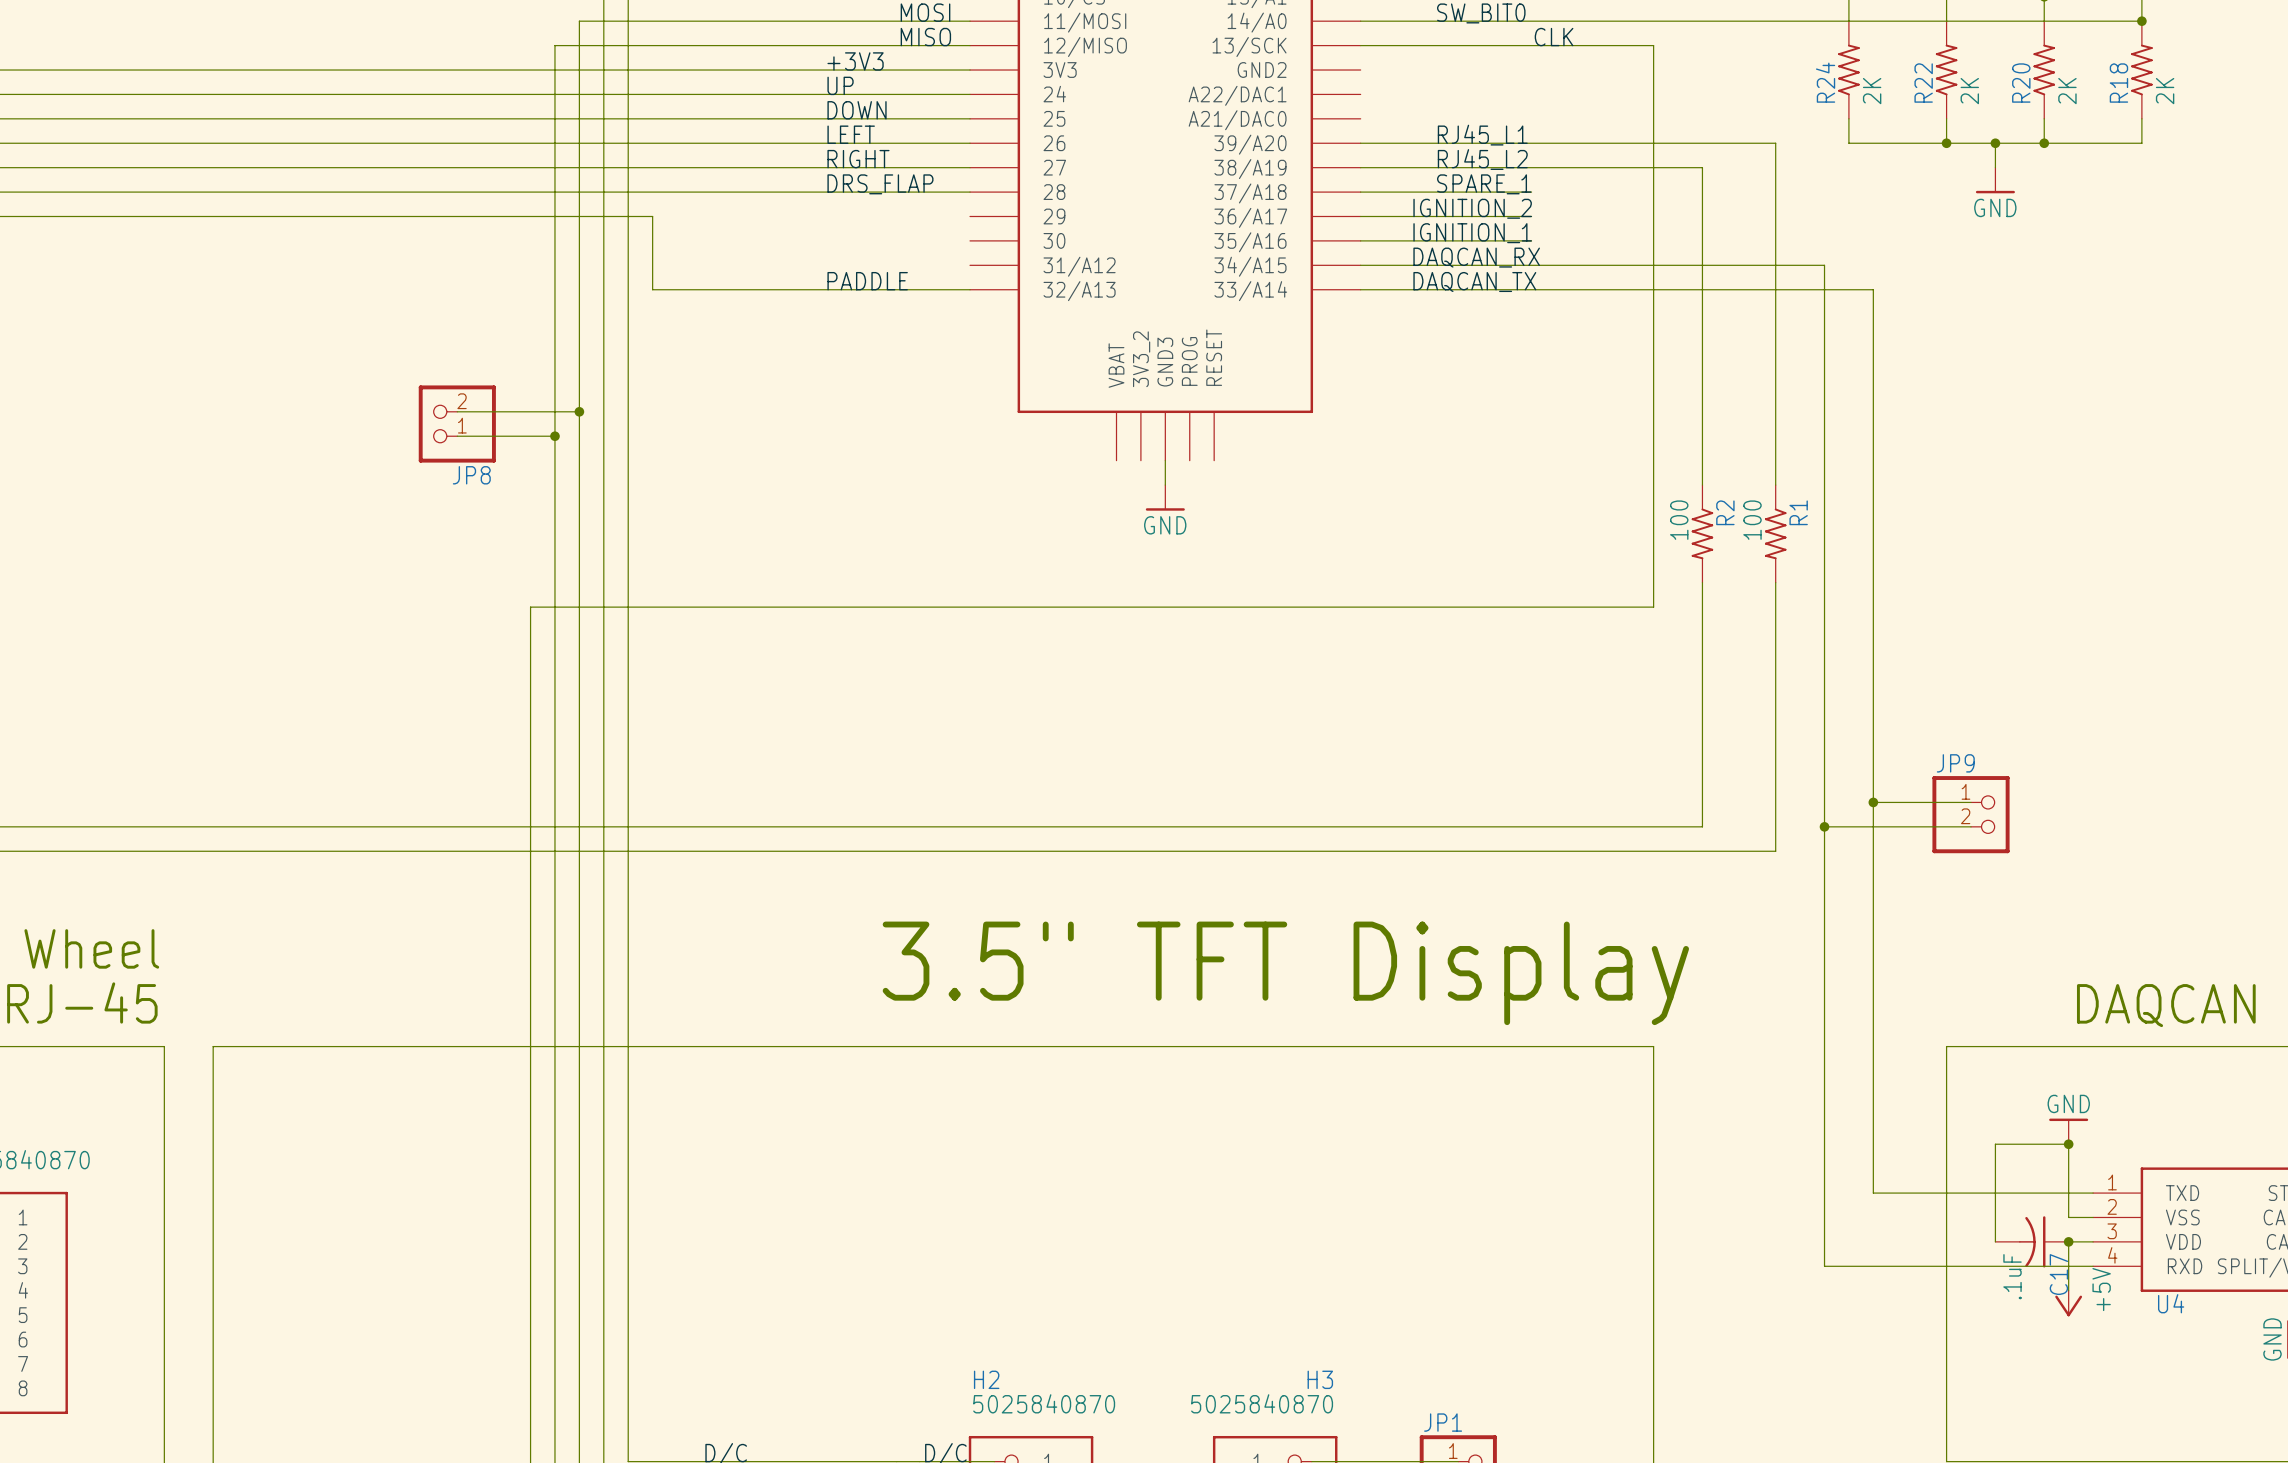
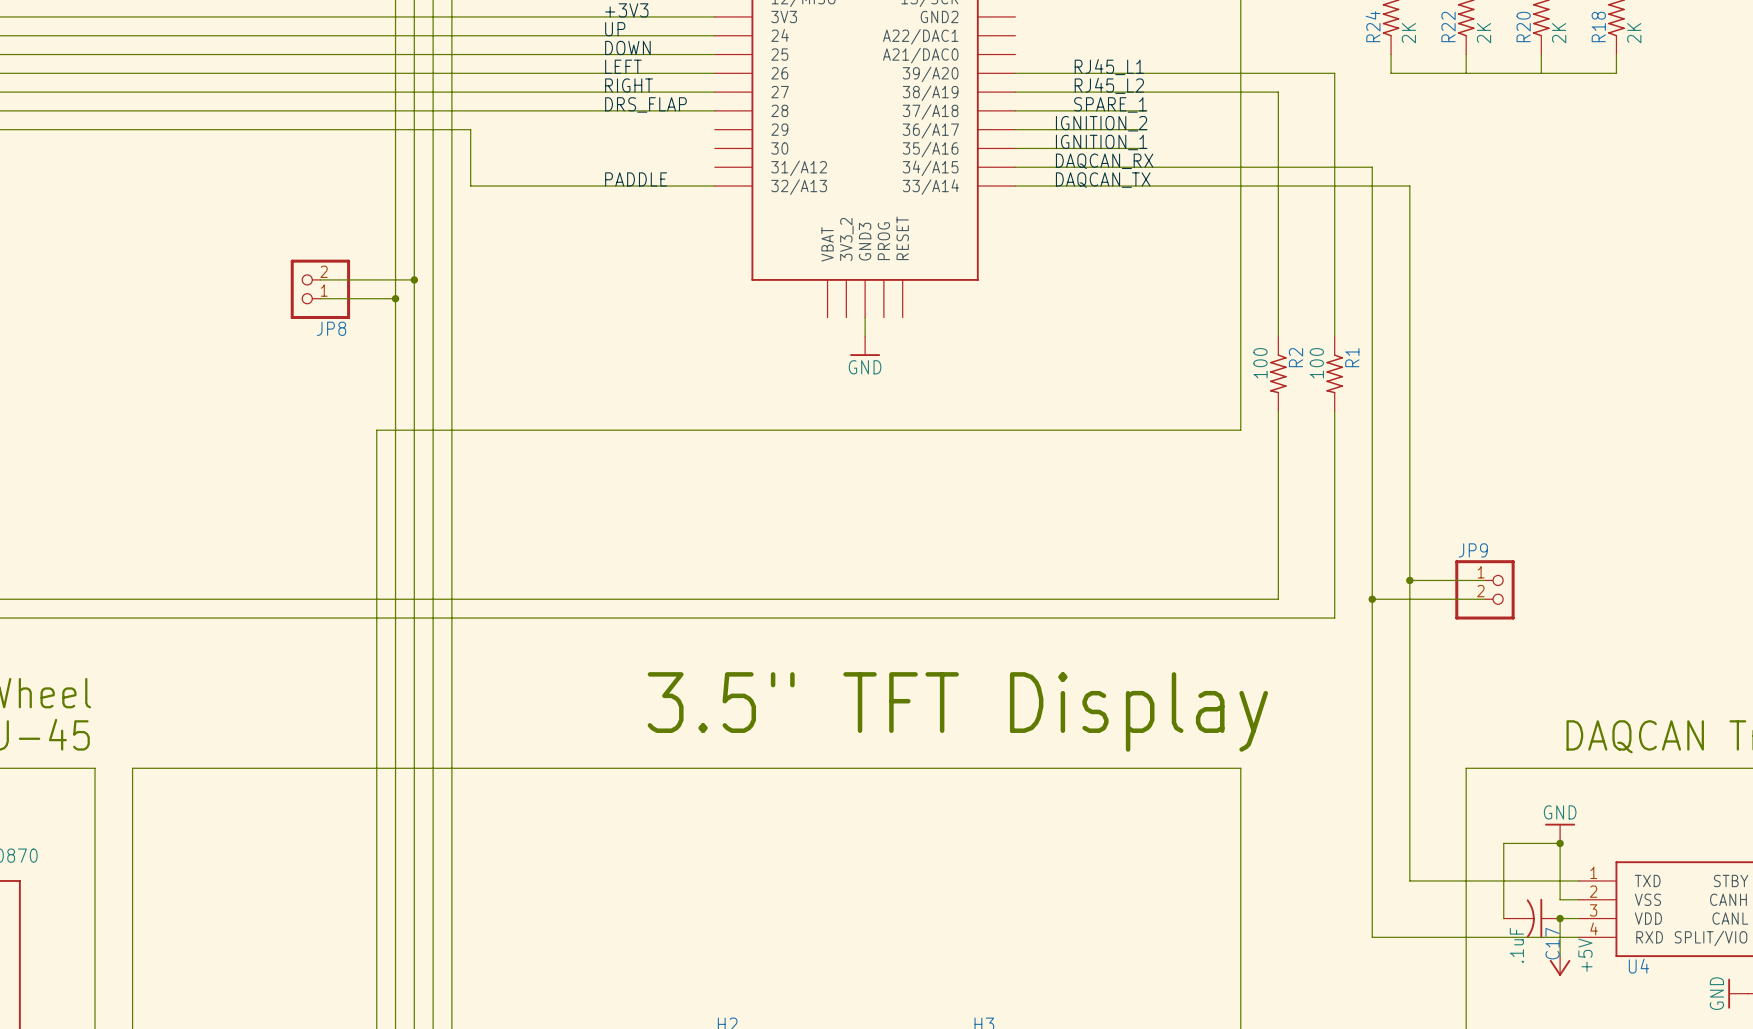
junction: (1946, 143) -> none
wire: (1995, 143) (1995, 167) -> none
junction: (1995, 143) -> none
junction: (2044, 143) -> none
power symbol: GND (1995, 180) -> none

